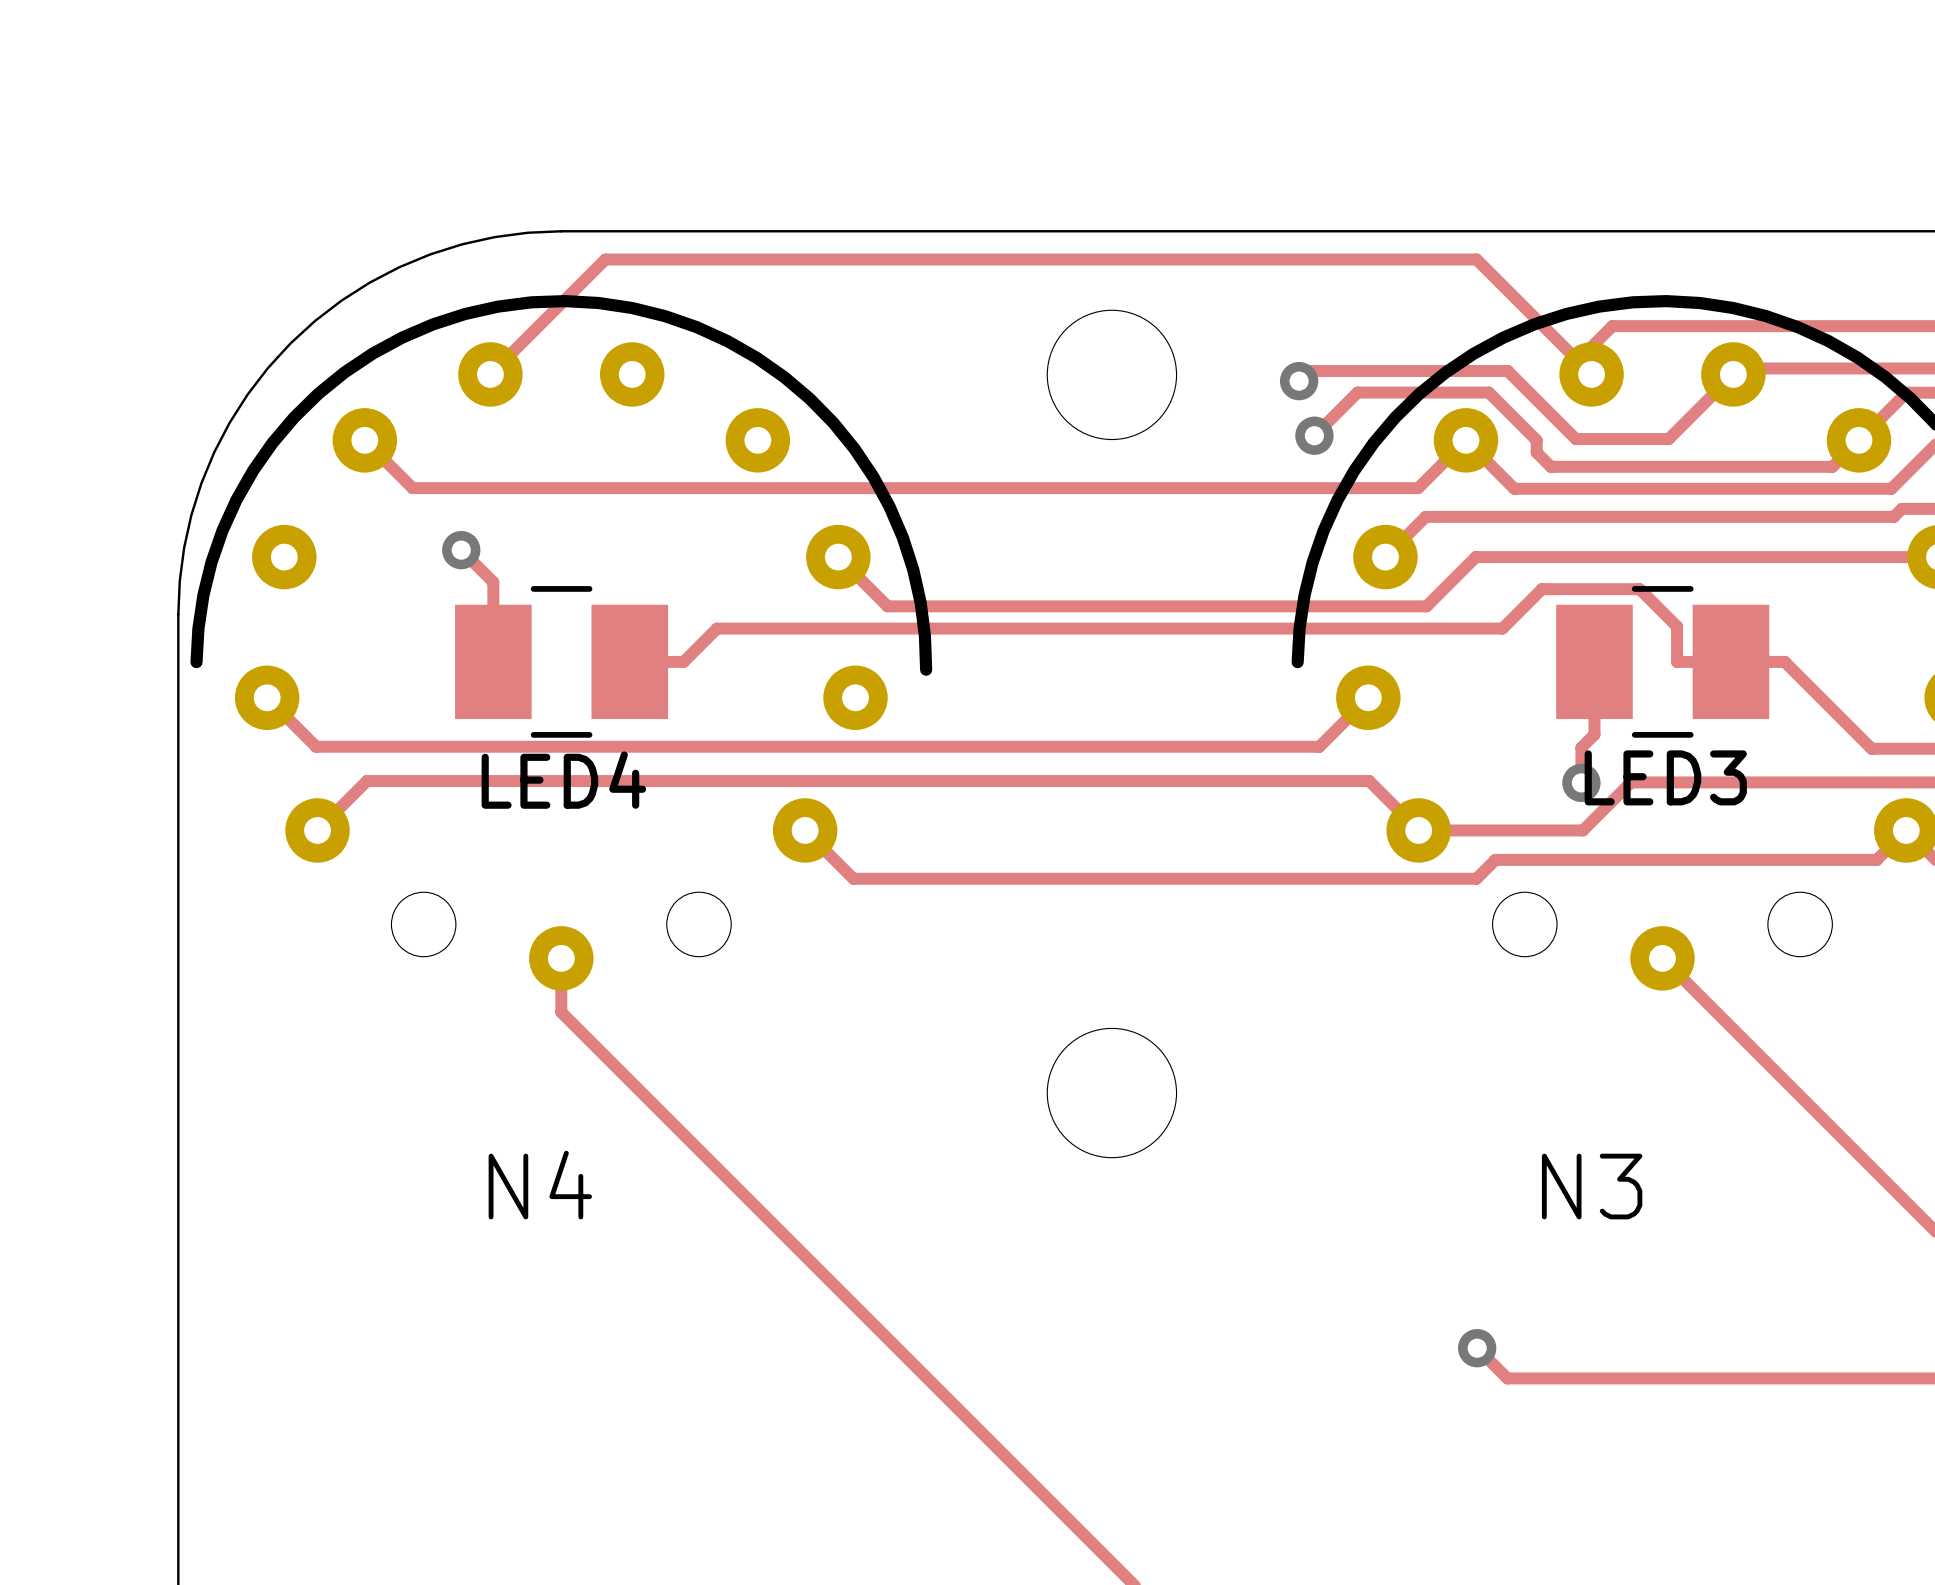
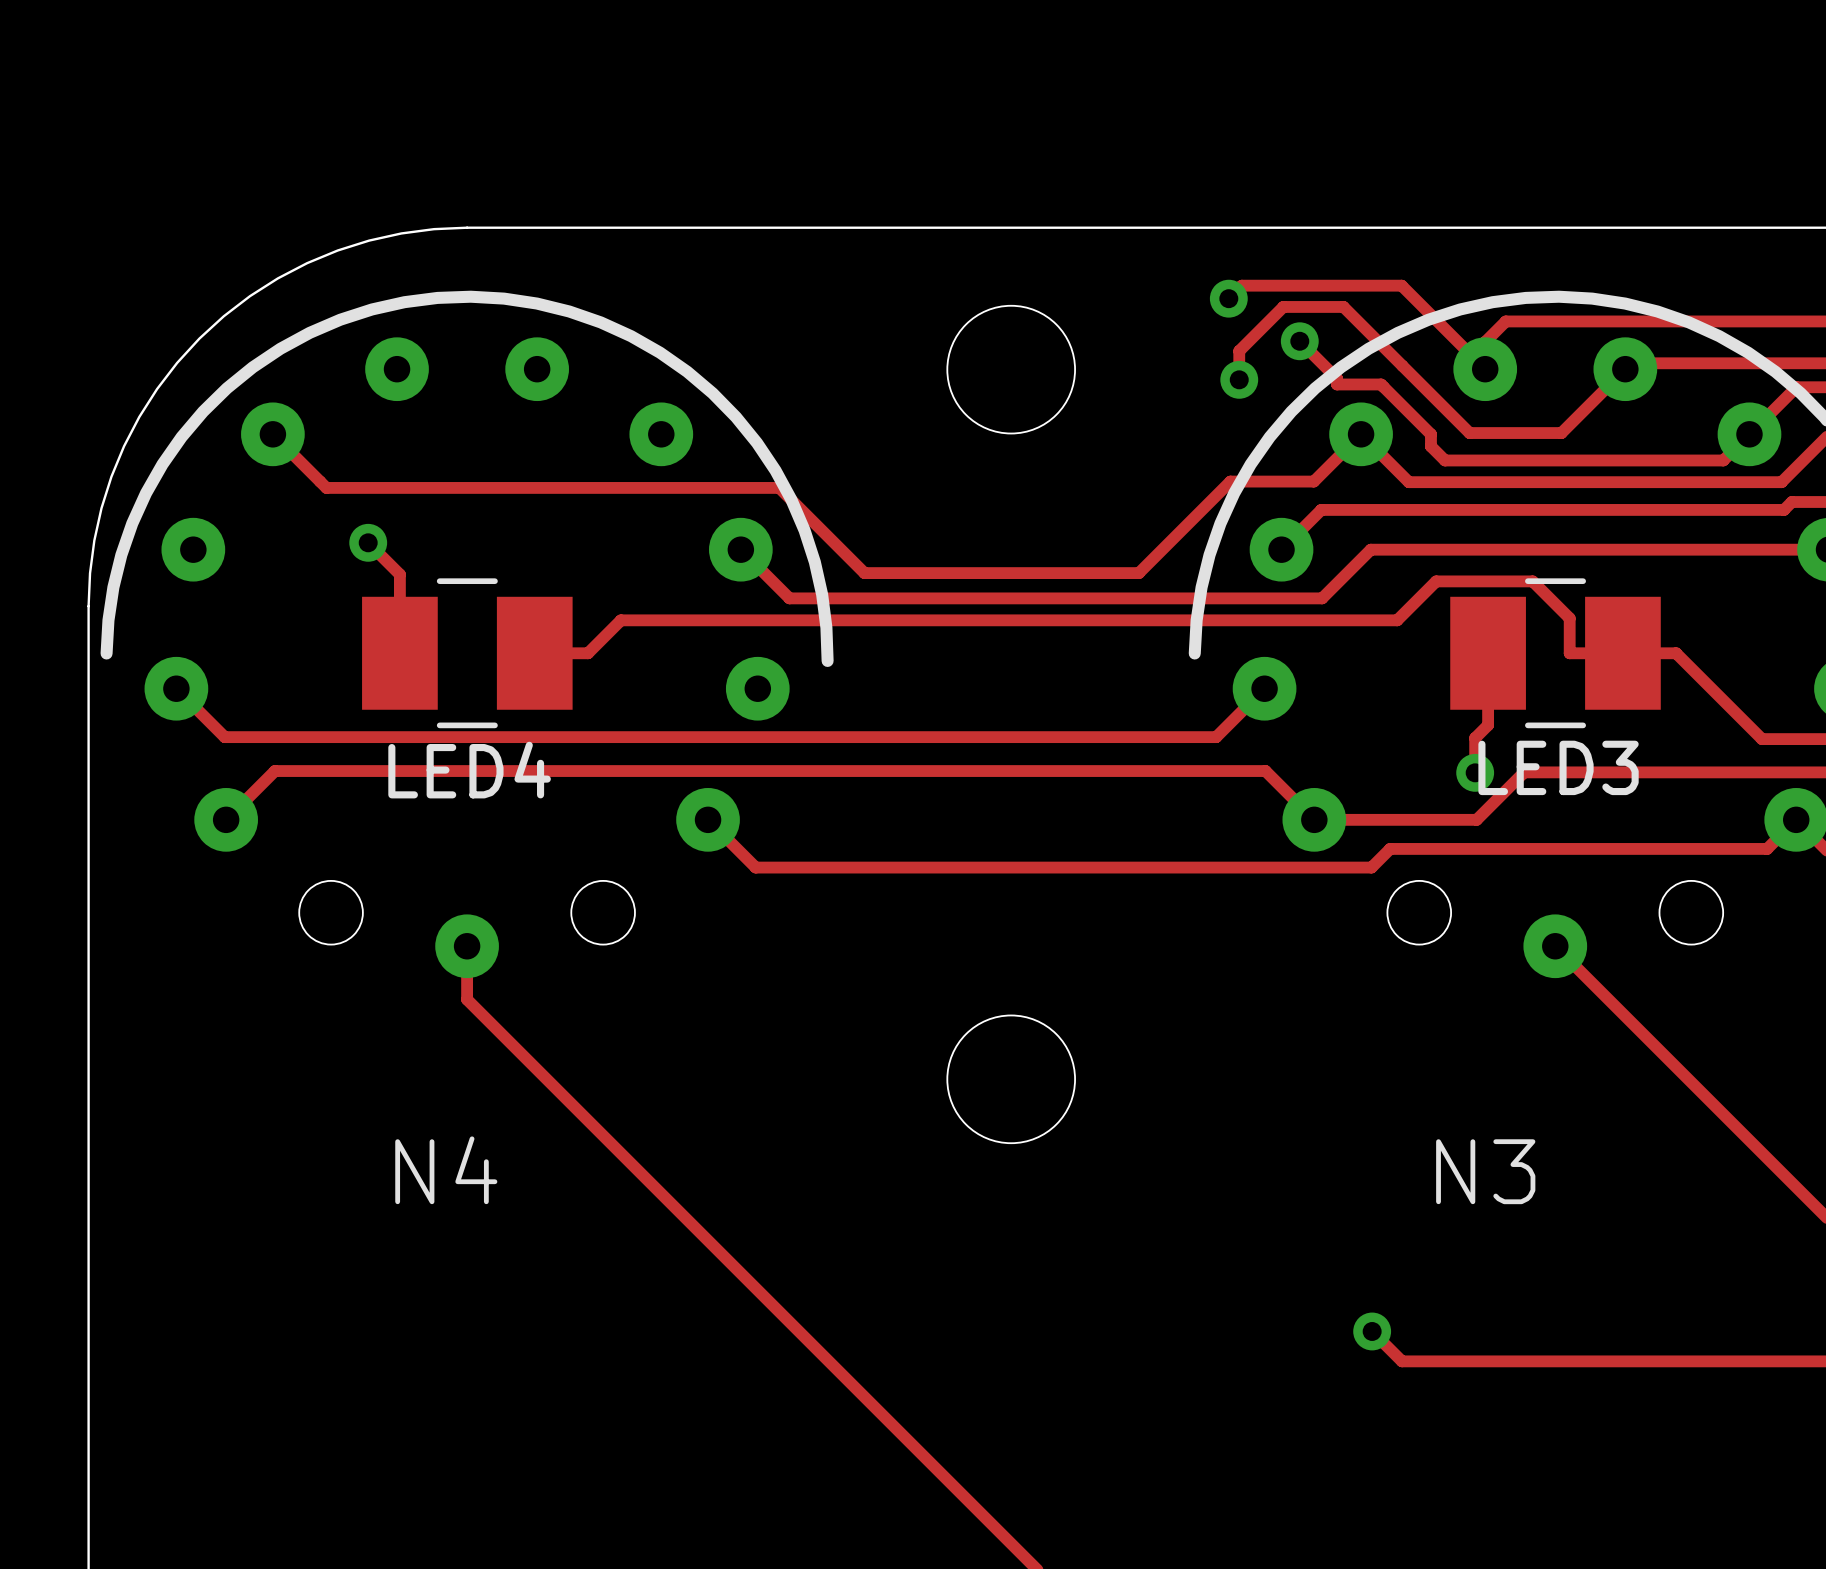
track: (1507, 289) (1476, 259) (605, 259) (490, 374) -> (1401, 285) (1241, 285) (1228, 298)
via: none -> (1228, 298)
via: none -> (1299, 341)
track: (1507, 371) (1309, 371) (1299, 381) -> (1402, 365) (1343, 306) (1283, 306) (1239, 351) (1239, 379)
via: (1299, 381) -> none
via: none -> (1239, 379)
track: (1488, 392) (1357, 392) (1314, 435) -> (1383, 387) (1381, 384) (1337, 384) (1337, 378) (1299, 341)
via: (1314, 435) -> none
track: (412, 488) (1333, 488) -> (320, 481) (326, 487) (779, 487) (864, 573) (1138, 573) (1230, 481)

